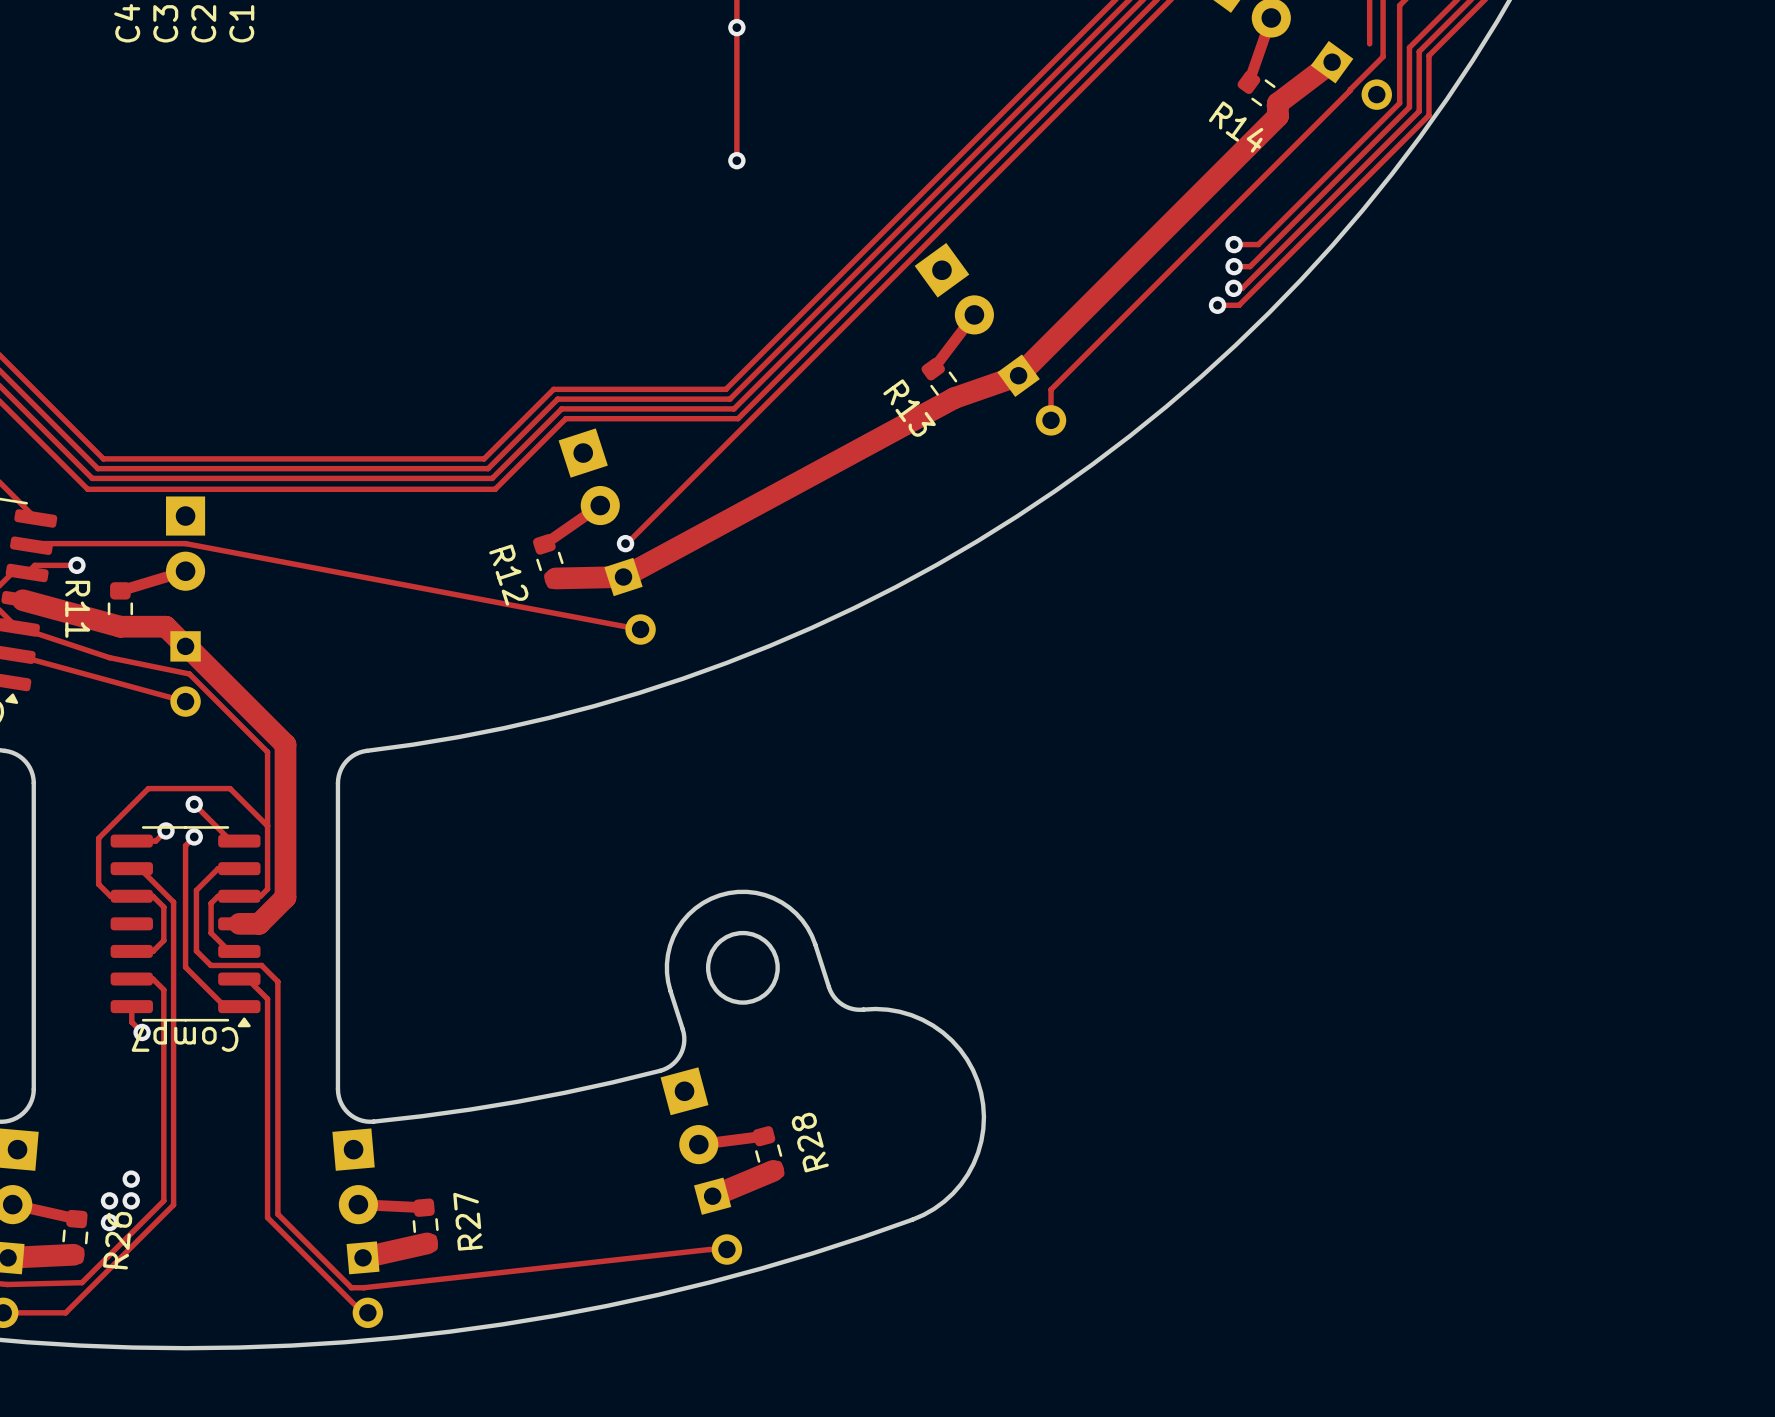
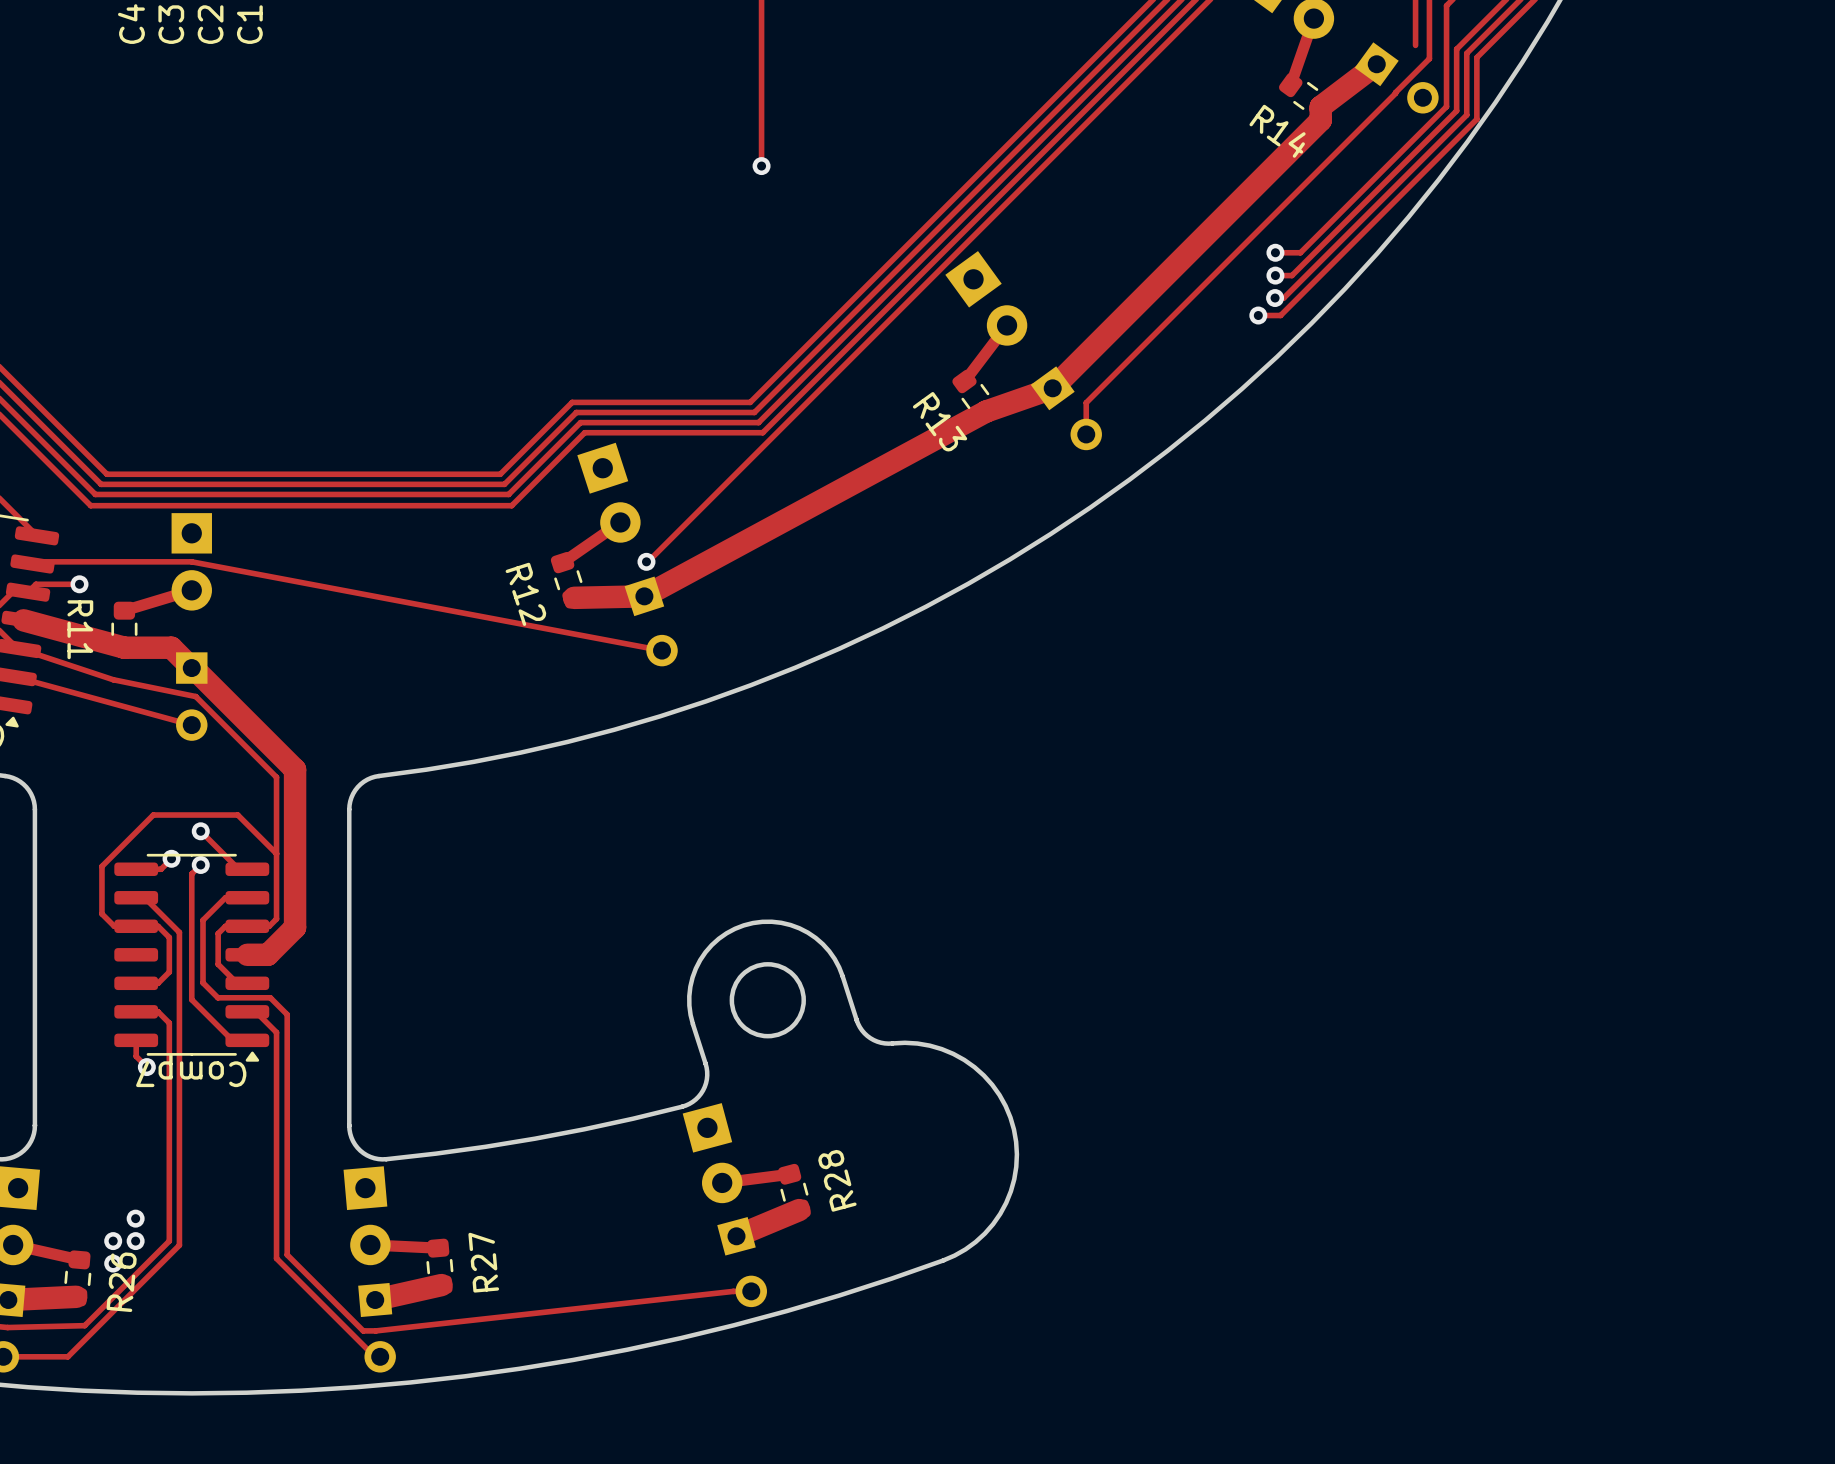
via: (736, 27) -> none

